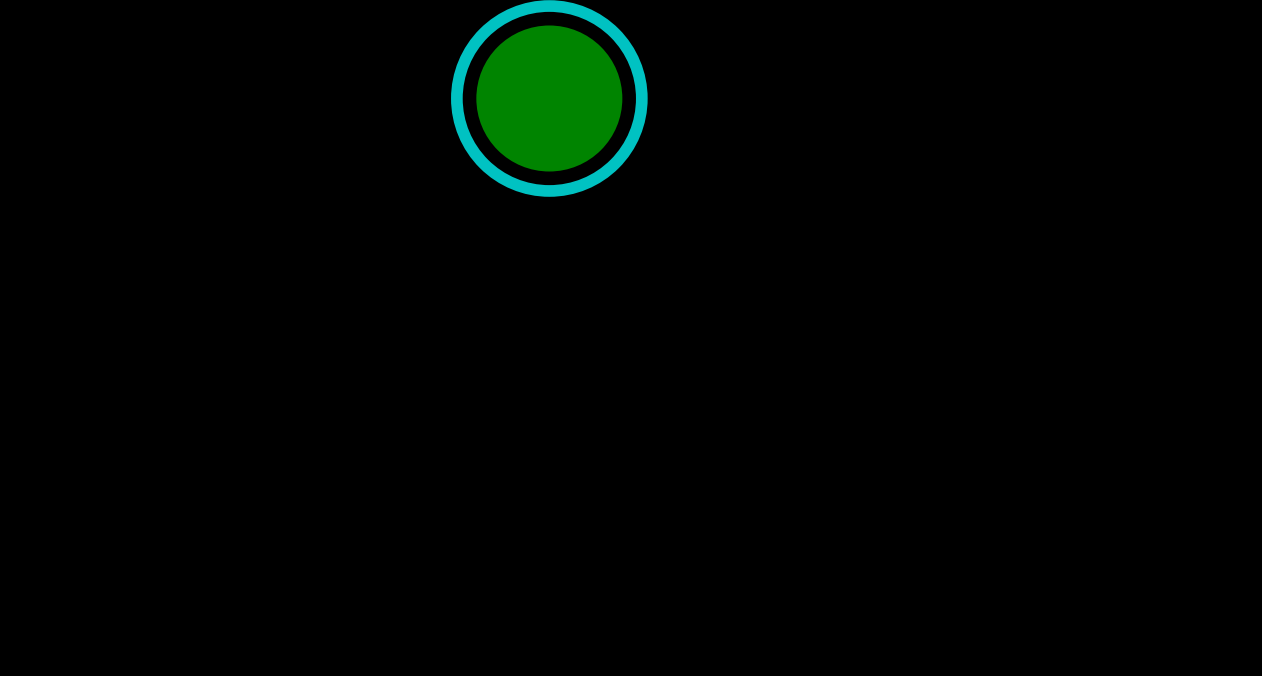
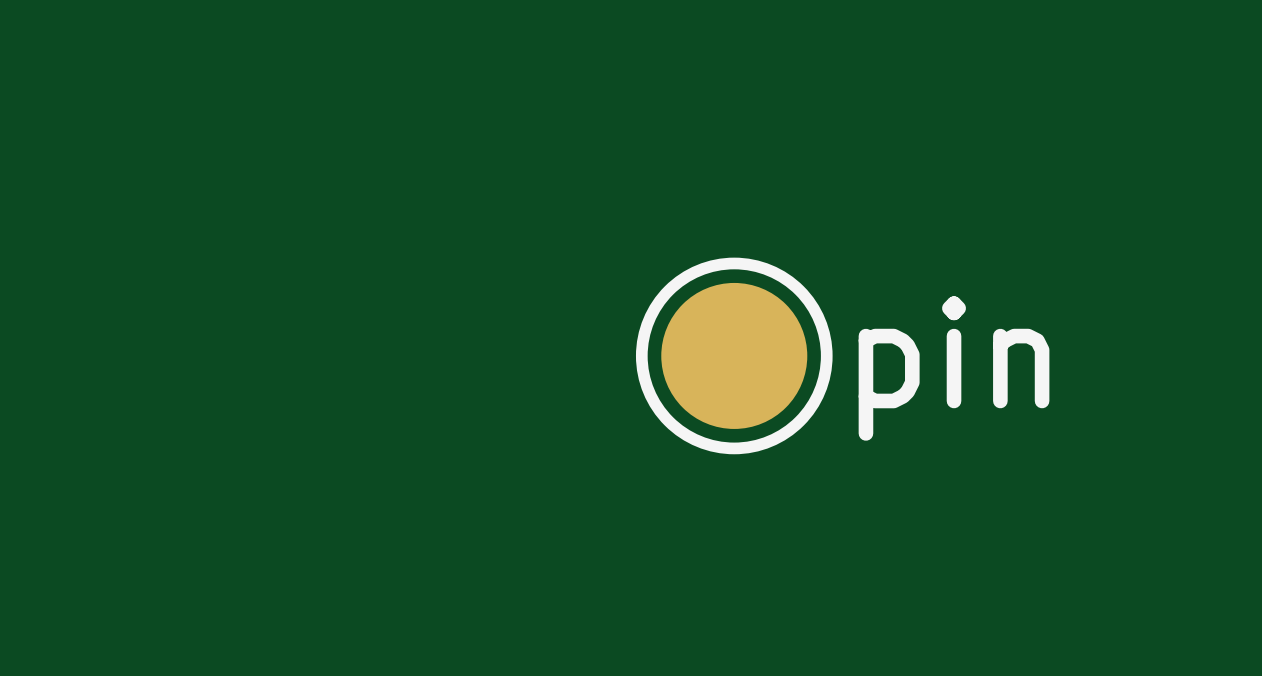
part position: (549, 98) -> (734, 355)
text: none -> pin (954, 368)

